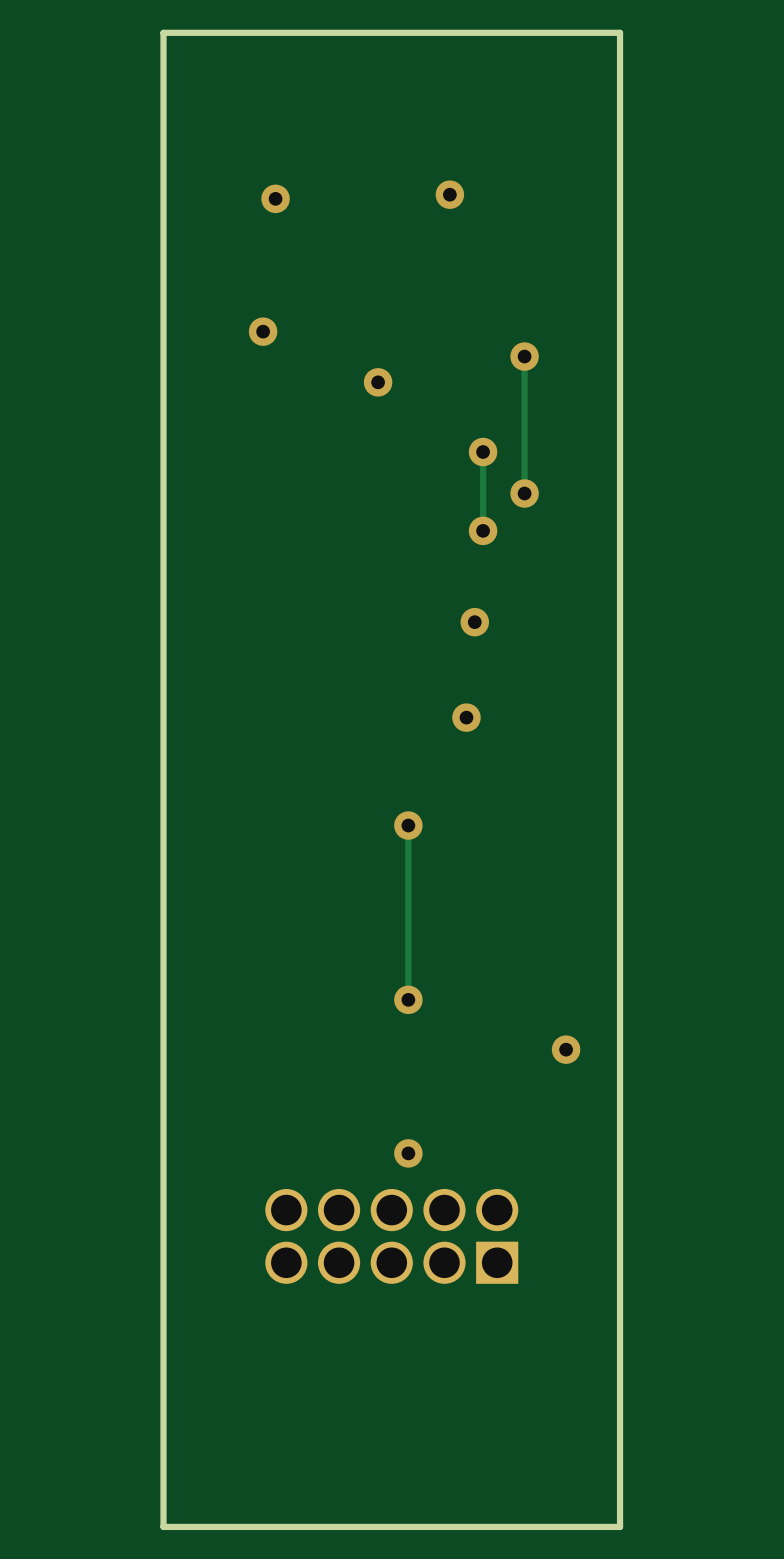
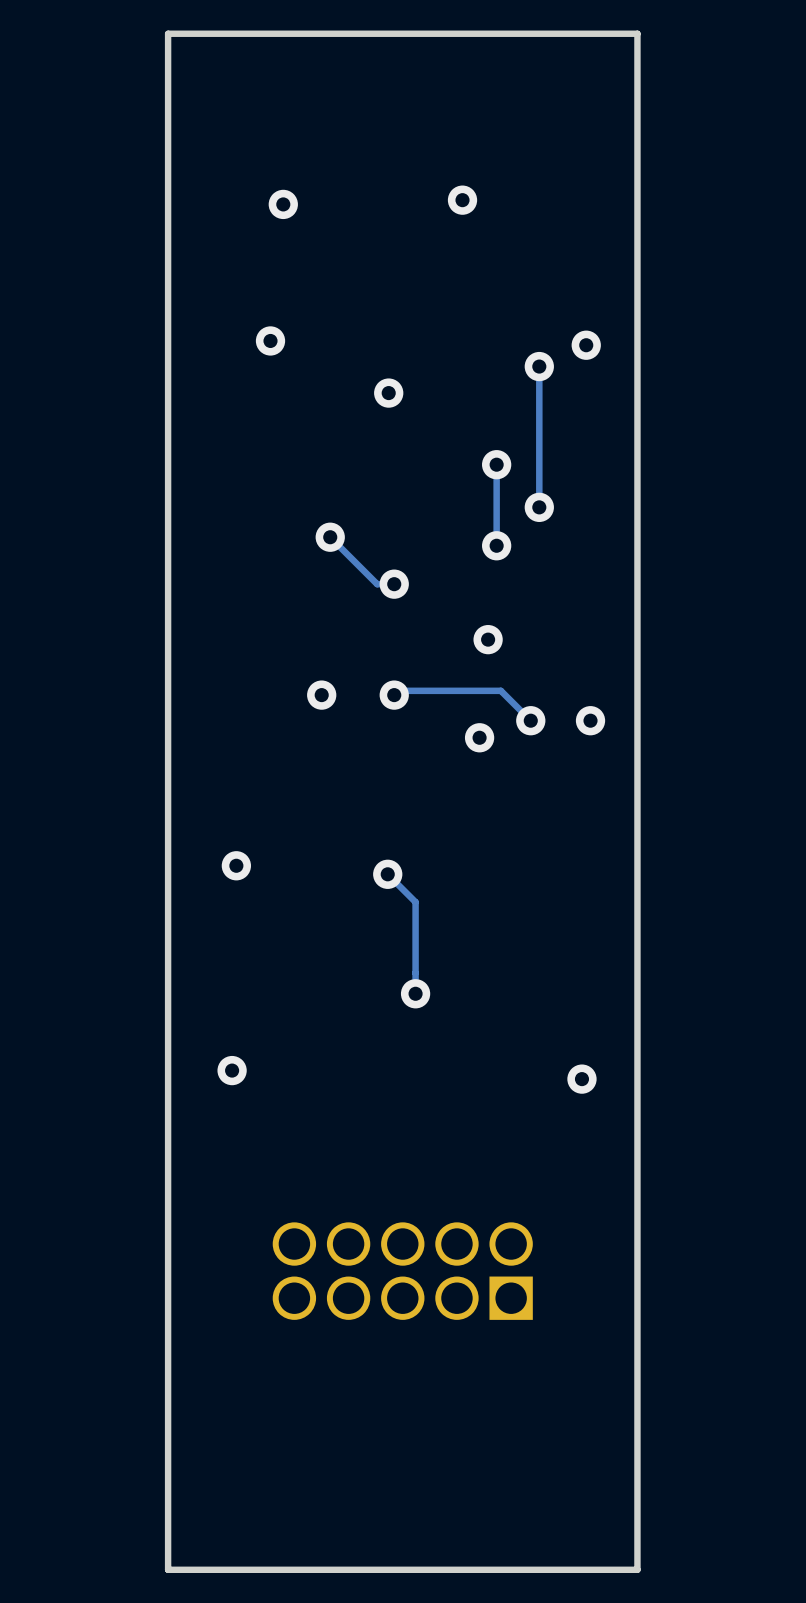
via: none -> (586, 345)
track: none -> (330, 537) (377, 584) (394, 584)
via: none -> (330, 537)
via: none -> (394, 584)
via: none -> (321, 695)
track: none -> (394, 695) (398, 690) (500, 690) (530, 720)
via: none -> (394, 695)
via: none -> (530, 720)
via: none -> (590, 720)
track: (408, 825) (408, 999) -> none
via position: (408, 825) -> (387, 874)
via: none -> (236, 865)
track: none -> (387, 874) (415, 902) (415, 993)
via position: (408, 999) -> (415, 993)
via: none -> (232, 1070)
via: (408, 1153) -> none

